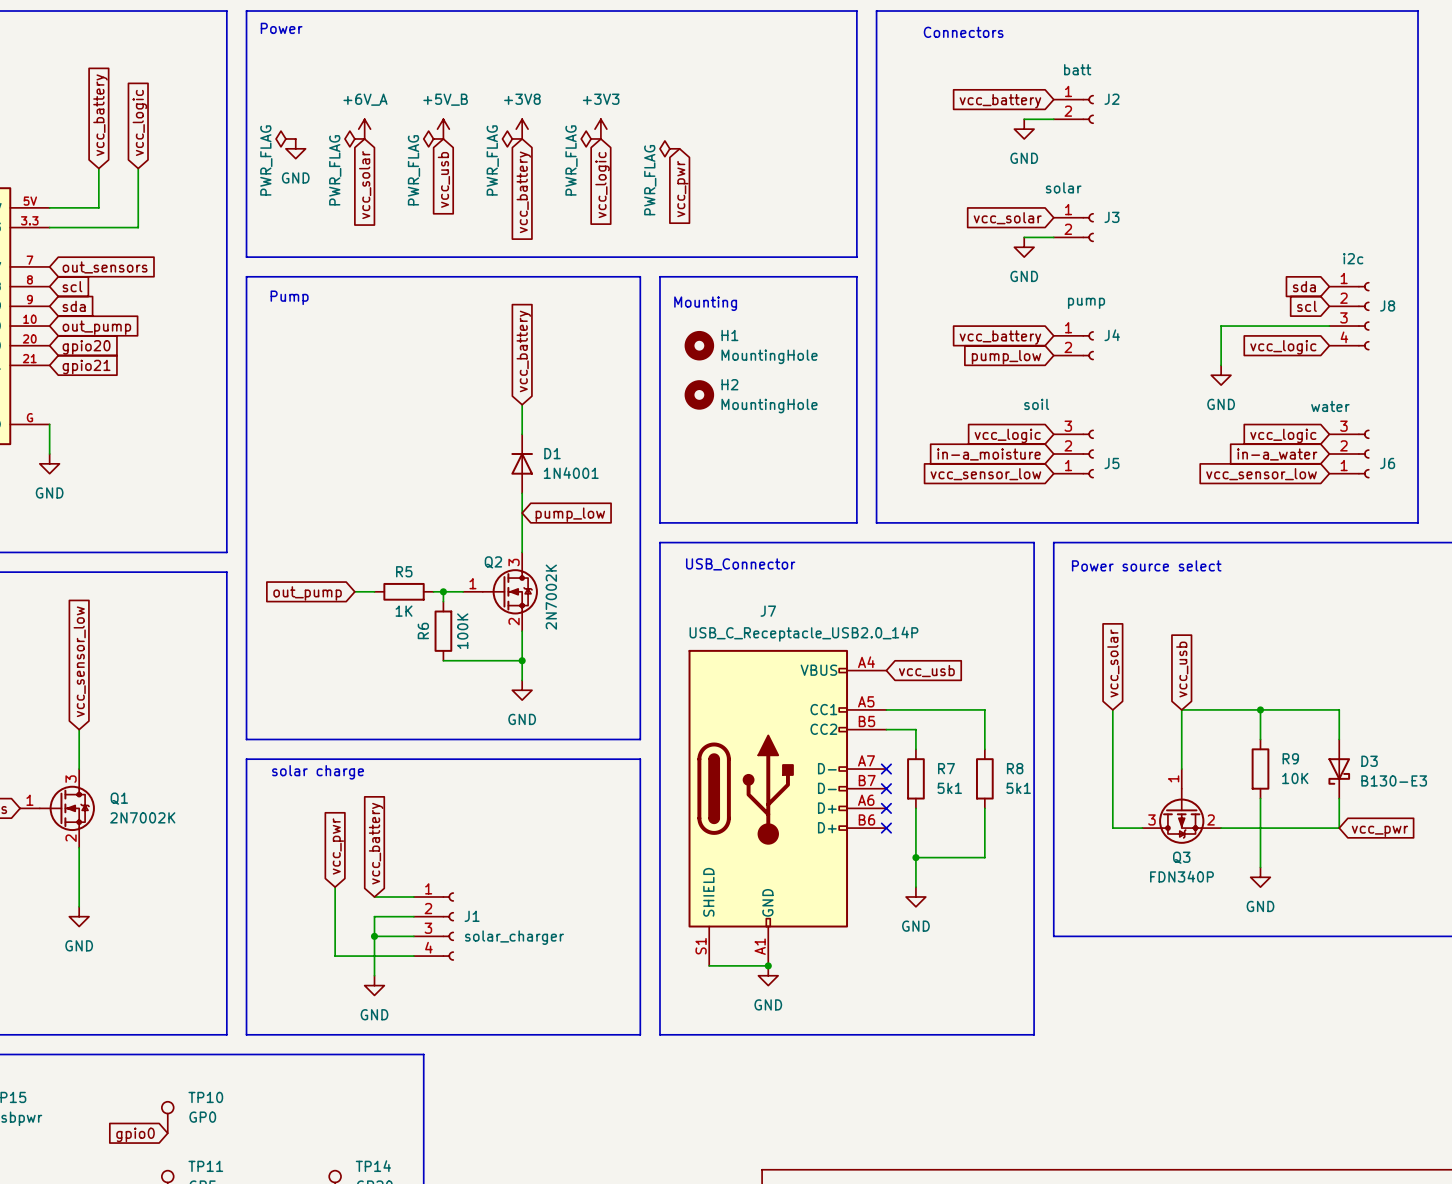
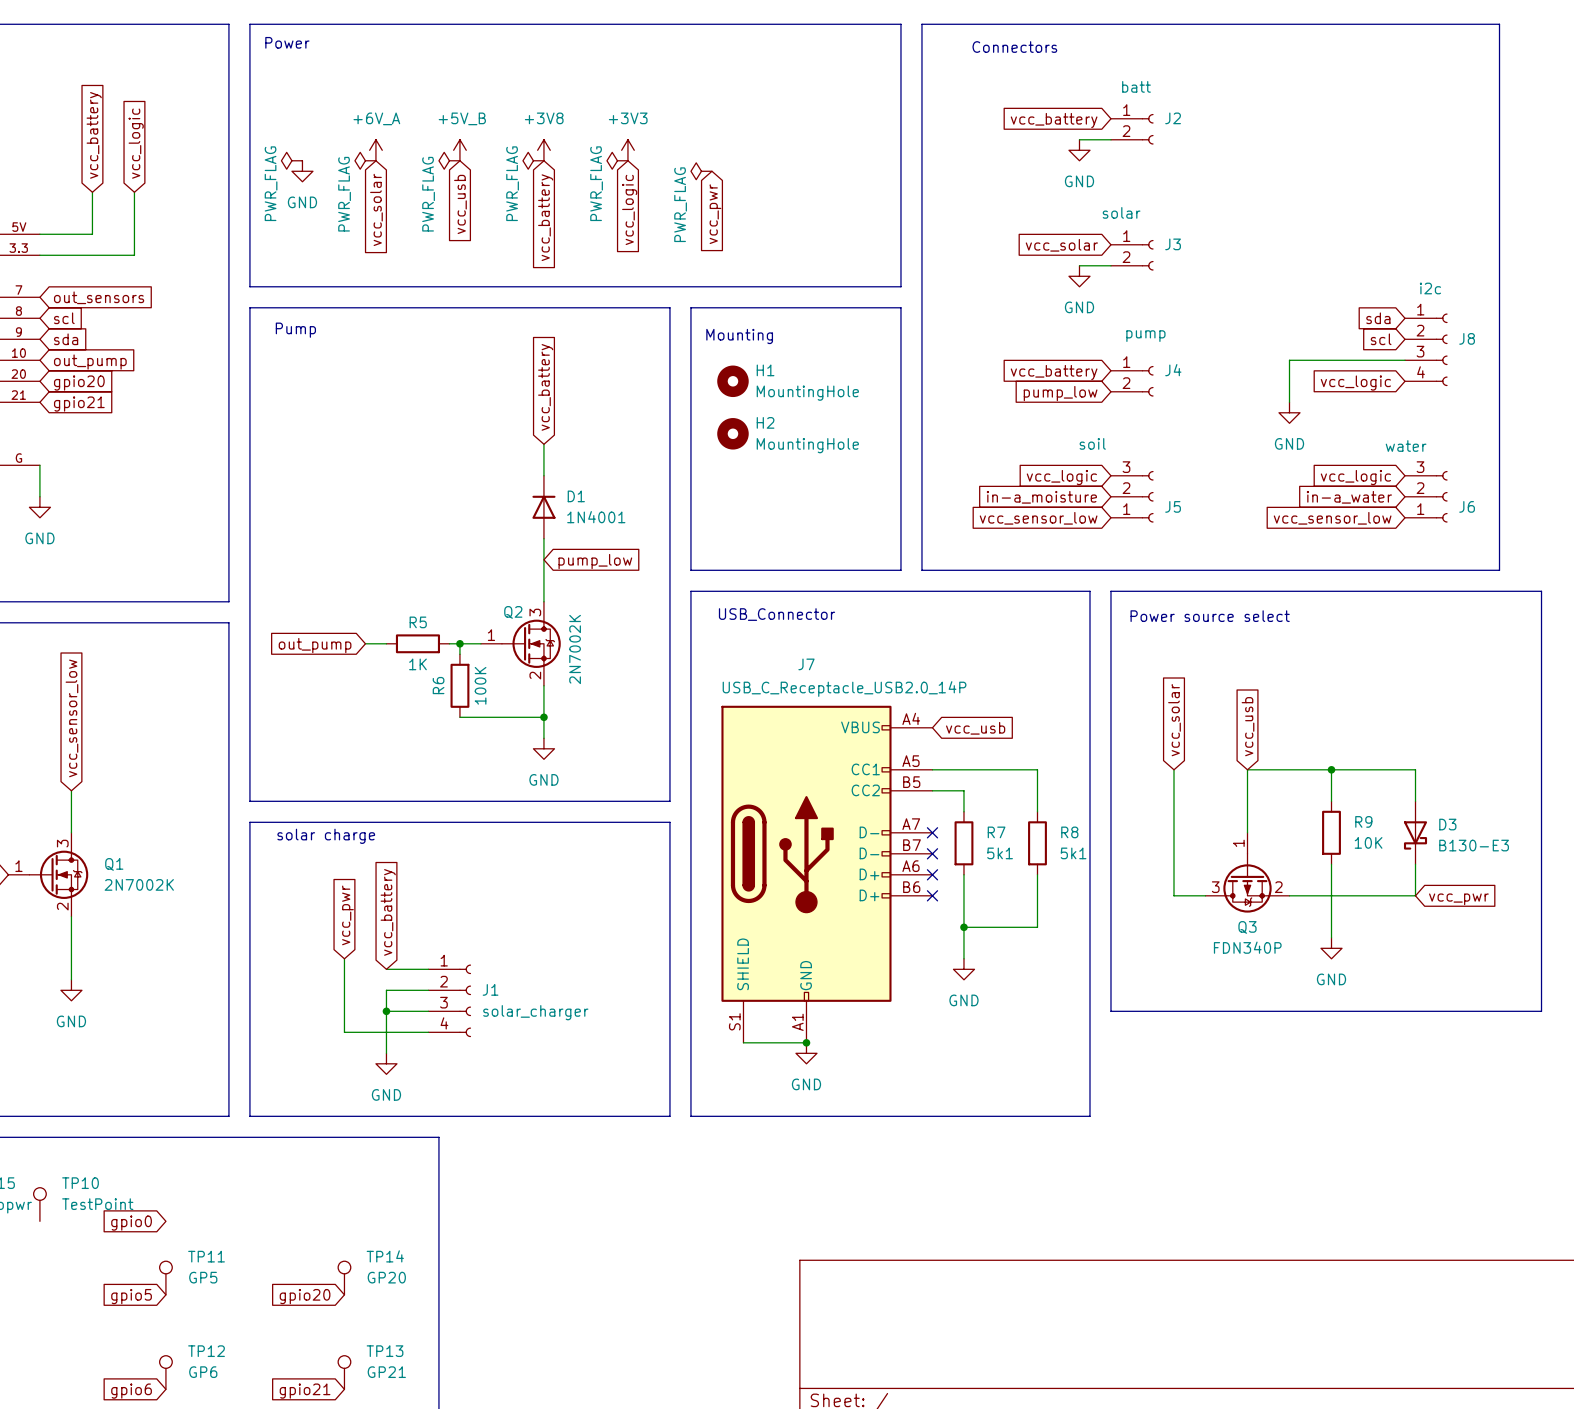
TP10 position: (167, 1117) -> (39, 1204)
TP10 value: GP0 (202, 1117) -> TestPoint (97, 1204)

